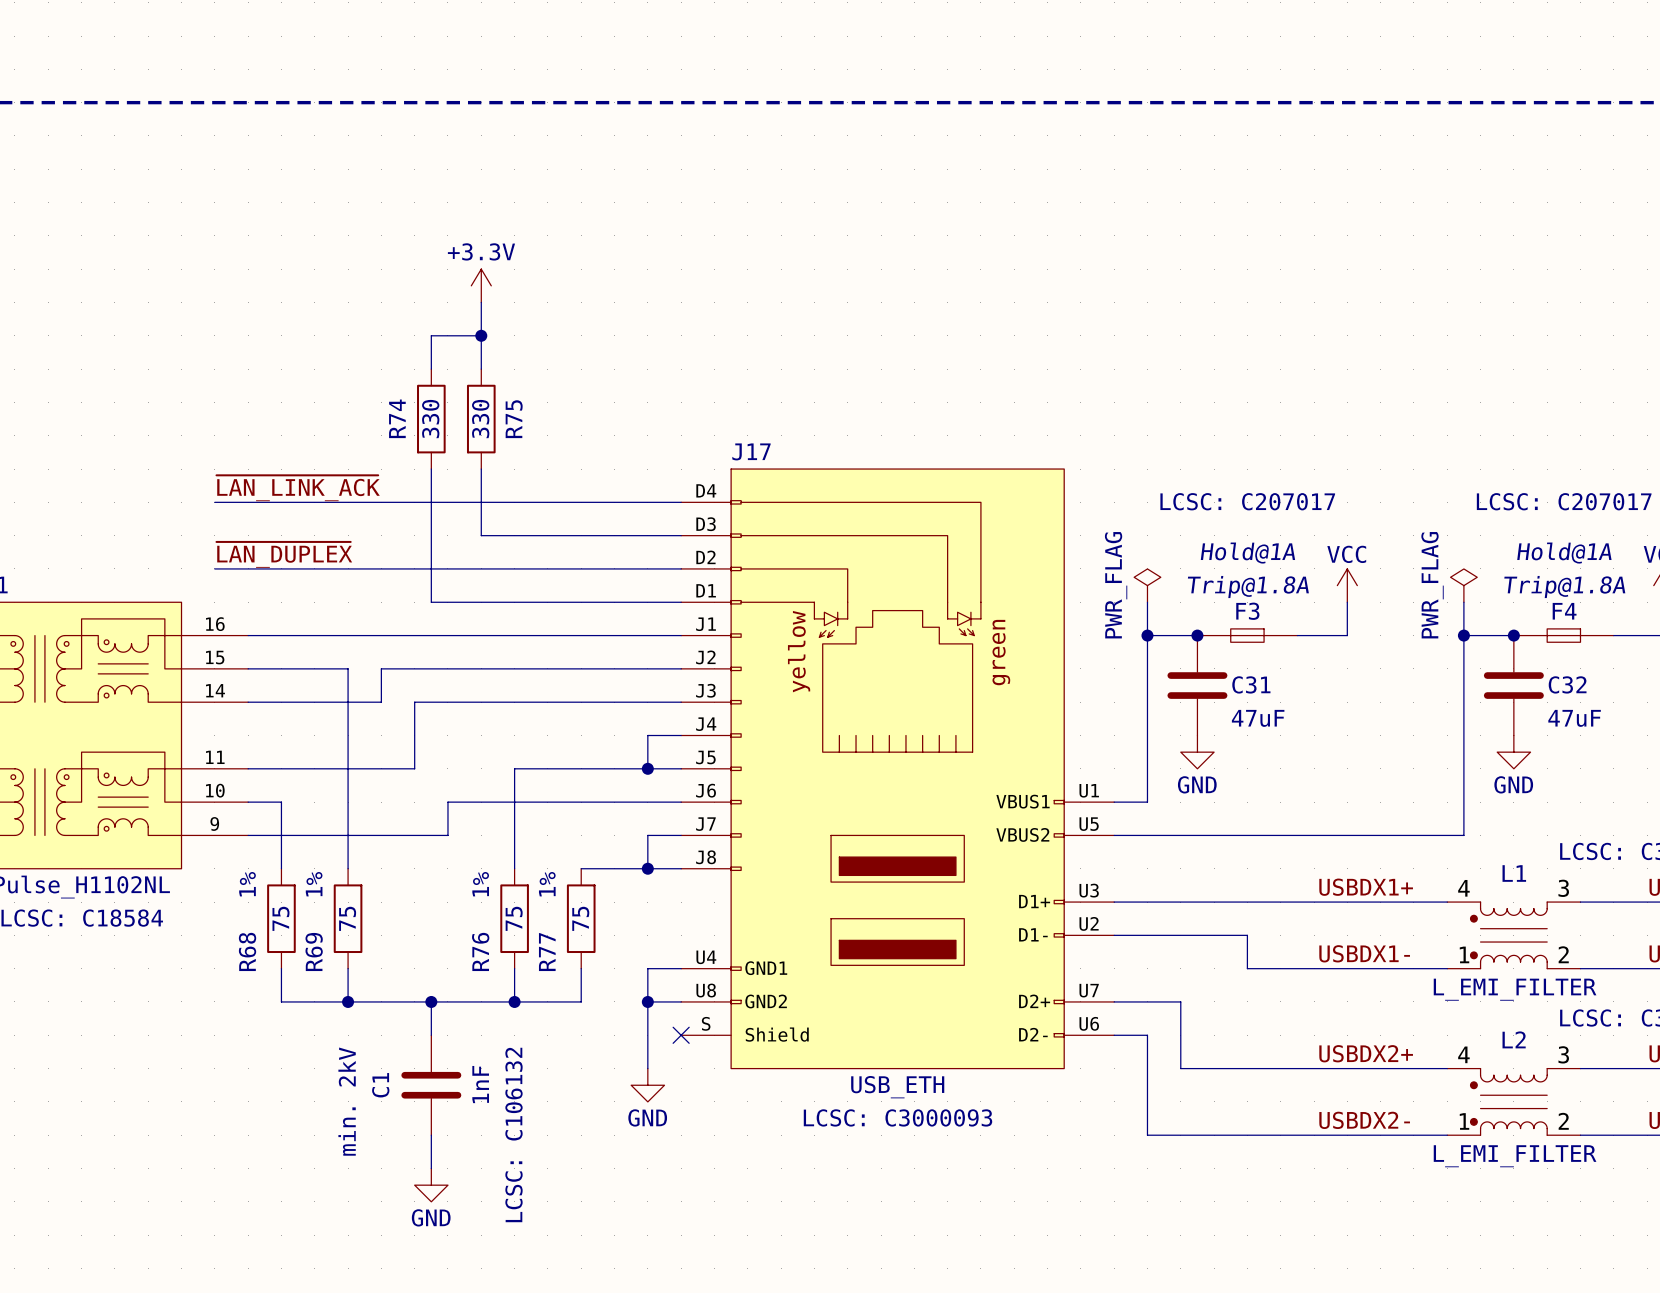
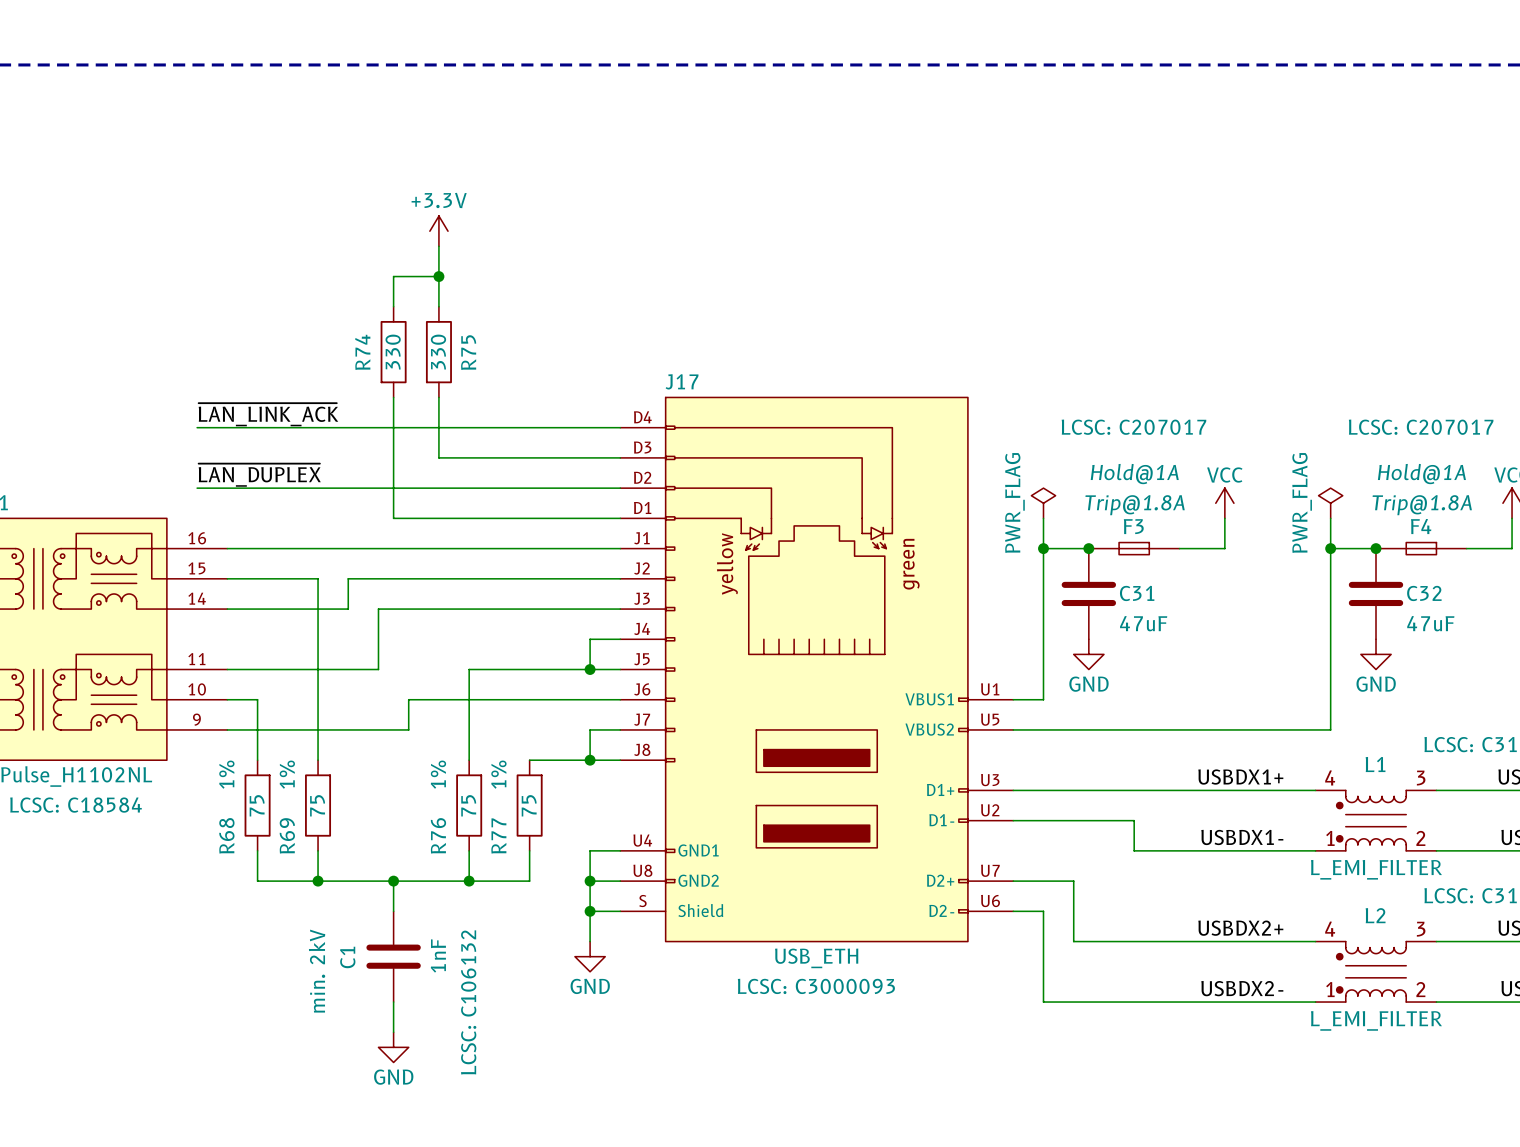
wire: none -> (590, 911) (620, 911)
junction: none -> (590, 911)
no-connect mark: (681, 1035) -> none

